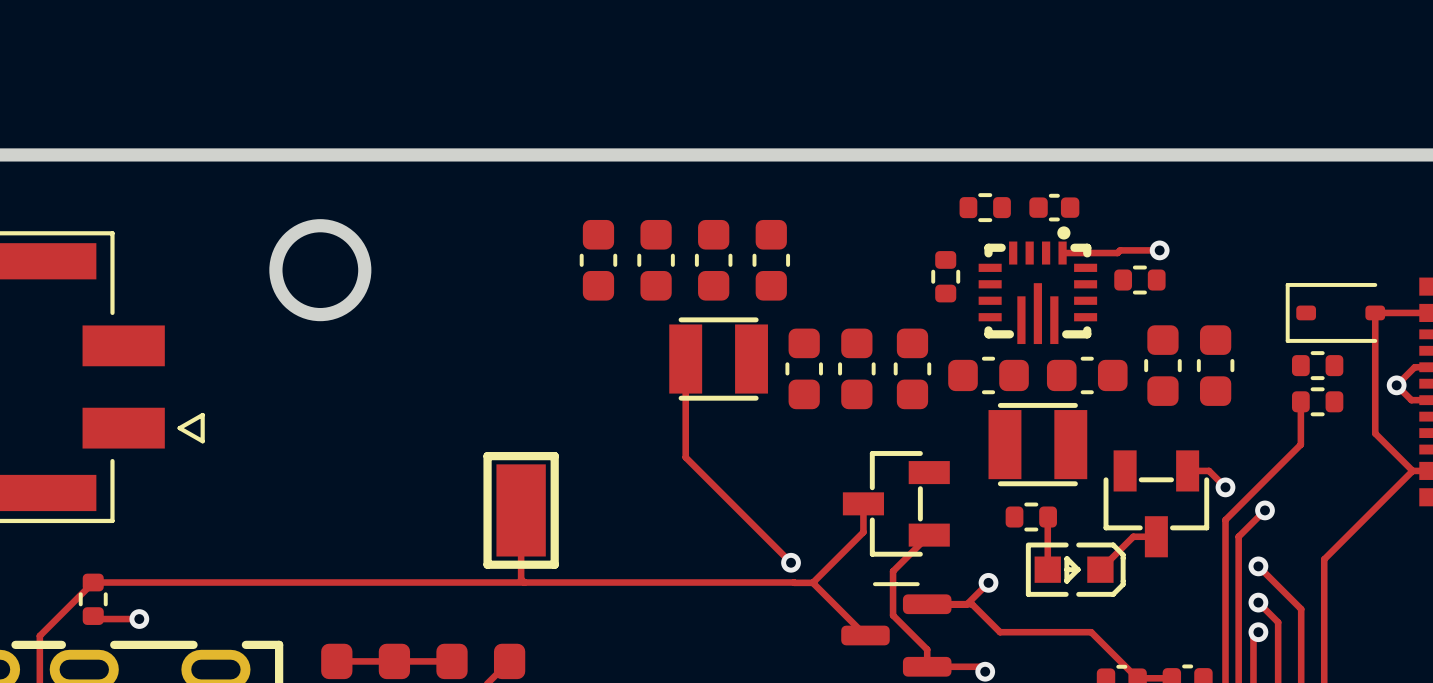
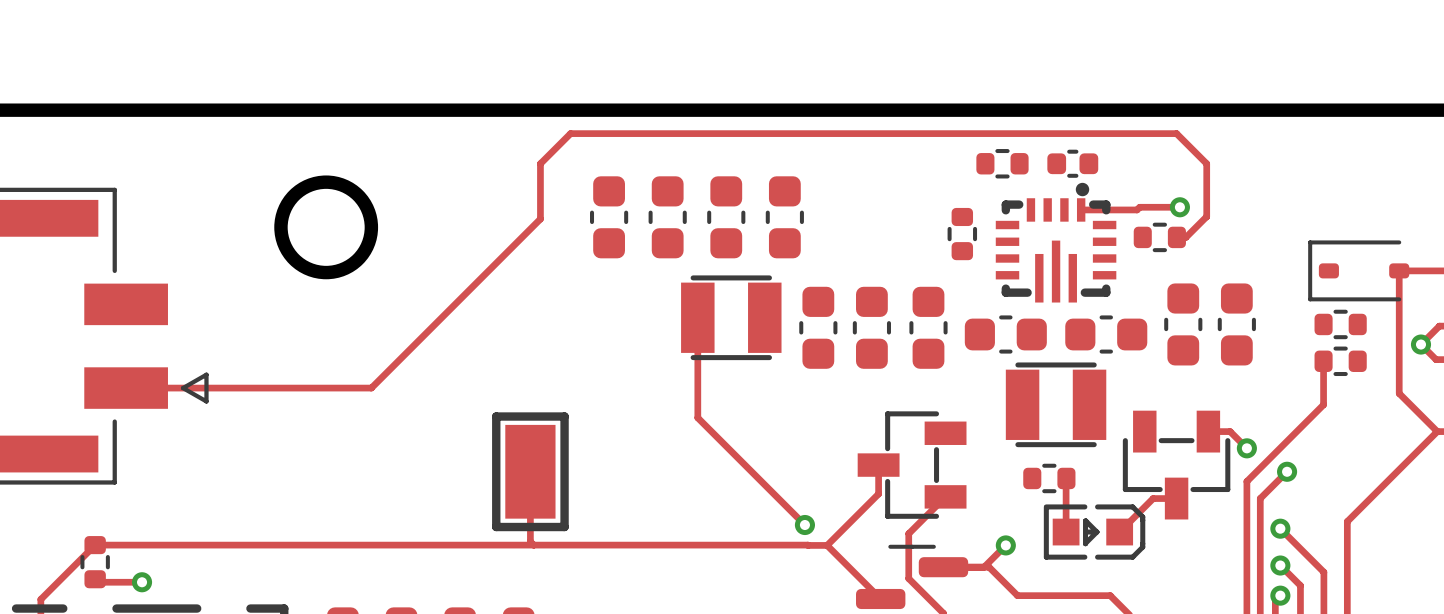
track: none -> (1176, 237) (1185, 237) (1206, 216) (1206, 163) (1176, 133) (570, 133) (540, 163) (540, 219) (371, 388) (126, 388)

